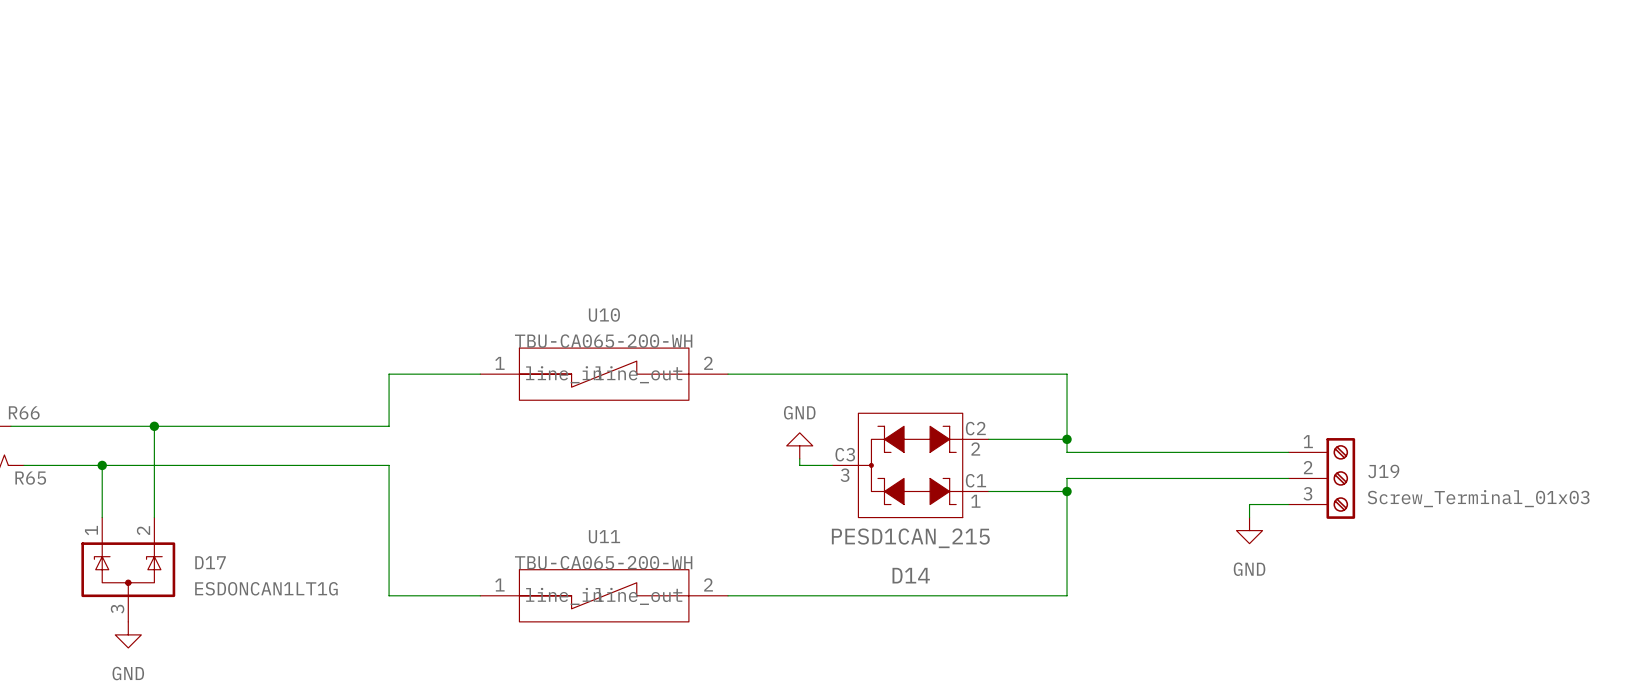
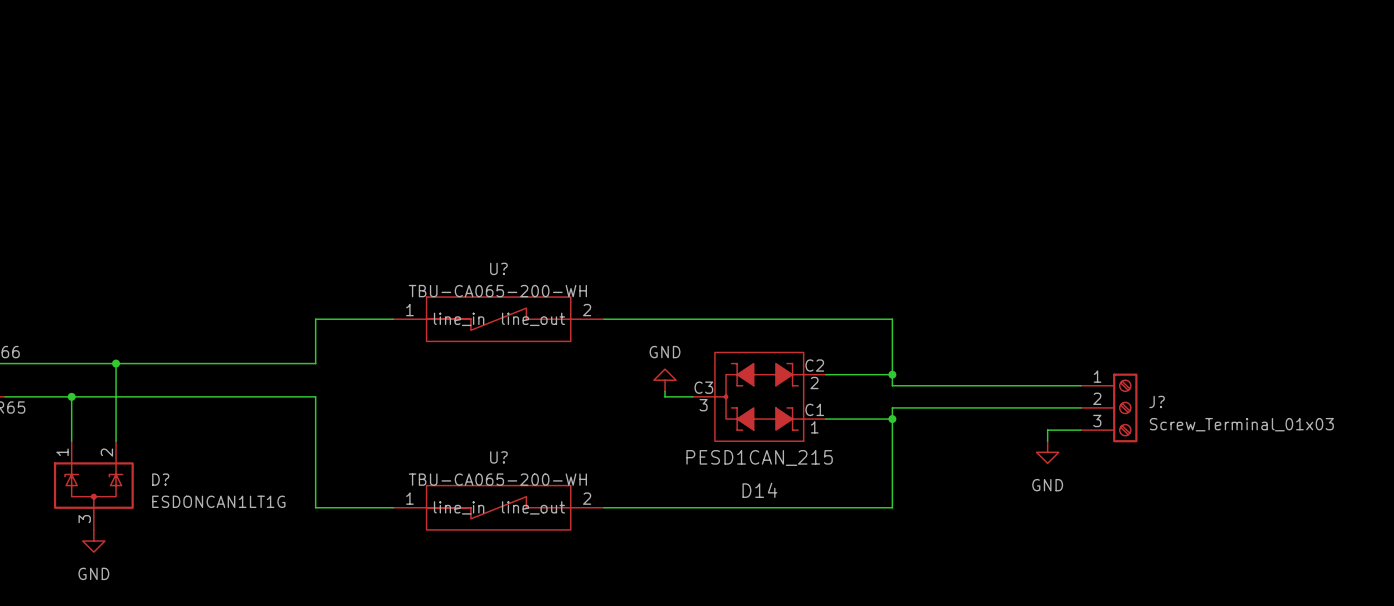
U10 name: U10 (604, 315) -> U? (498, 268)
J19 name: J19 (1383, 471) -> J? (1157, 401)
U11 name: U11 (604, 536) -> U? (498, 457)
D17 name: D17 (210, 562) -> D? (160, 479)

